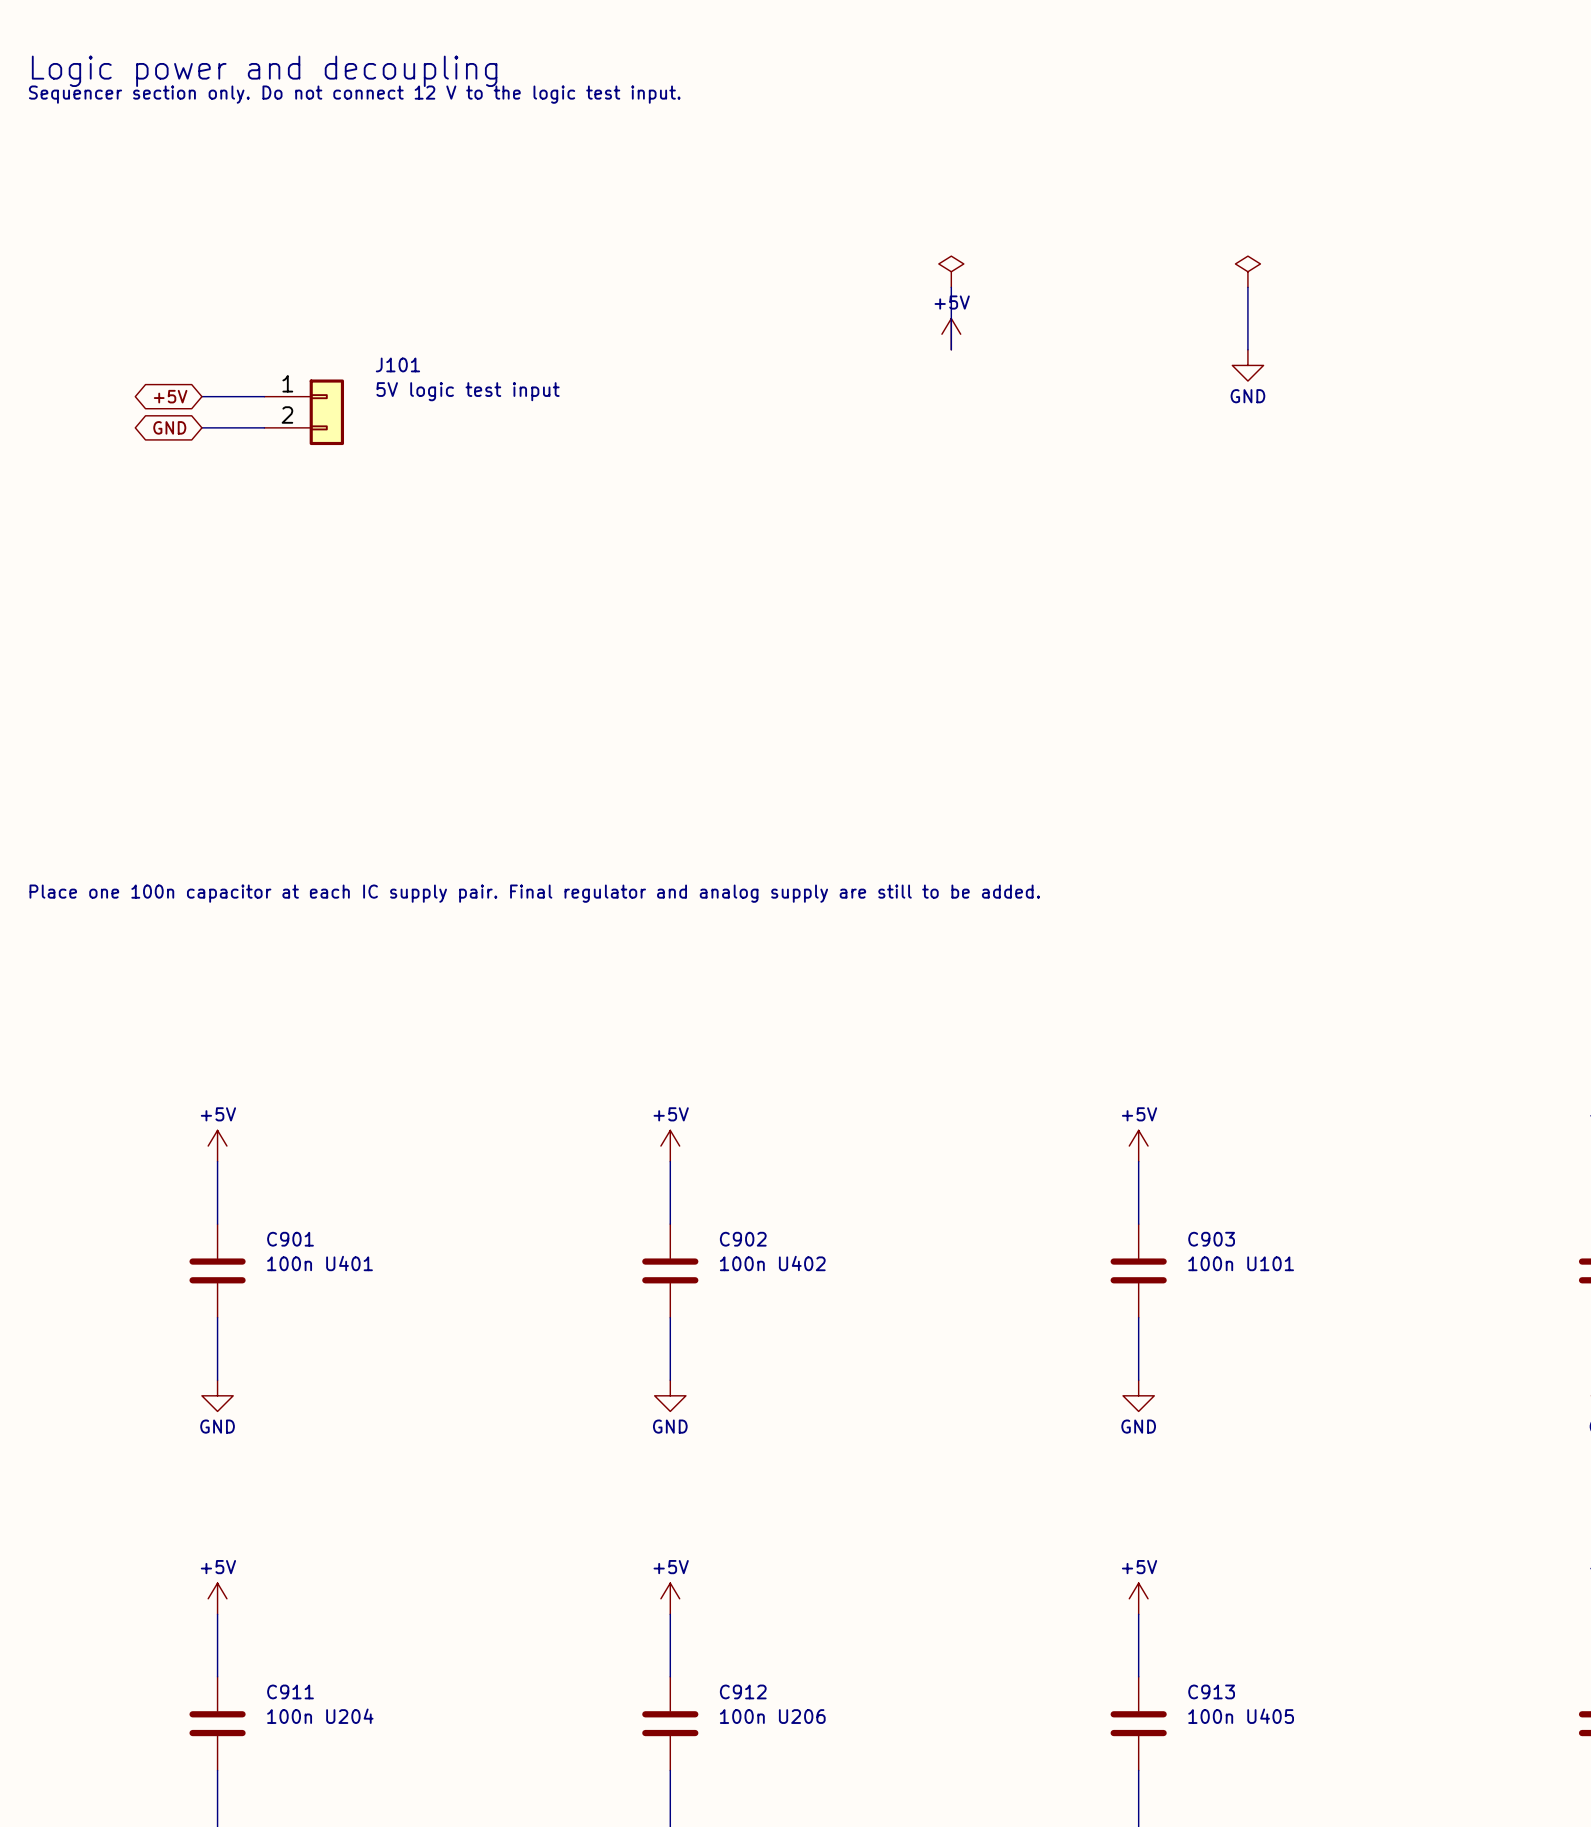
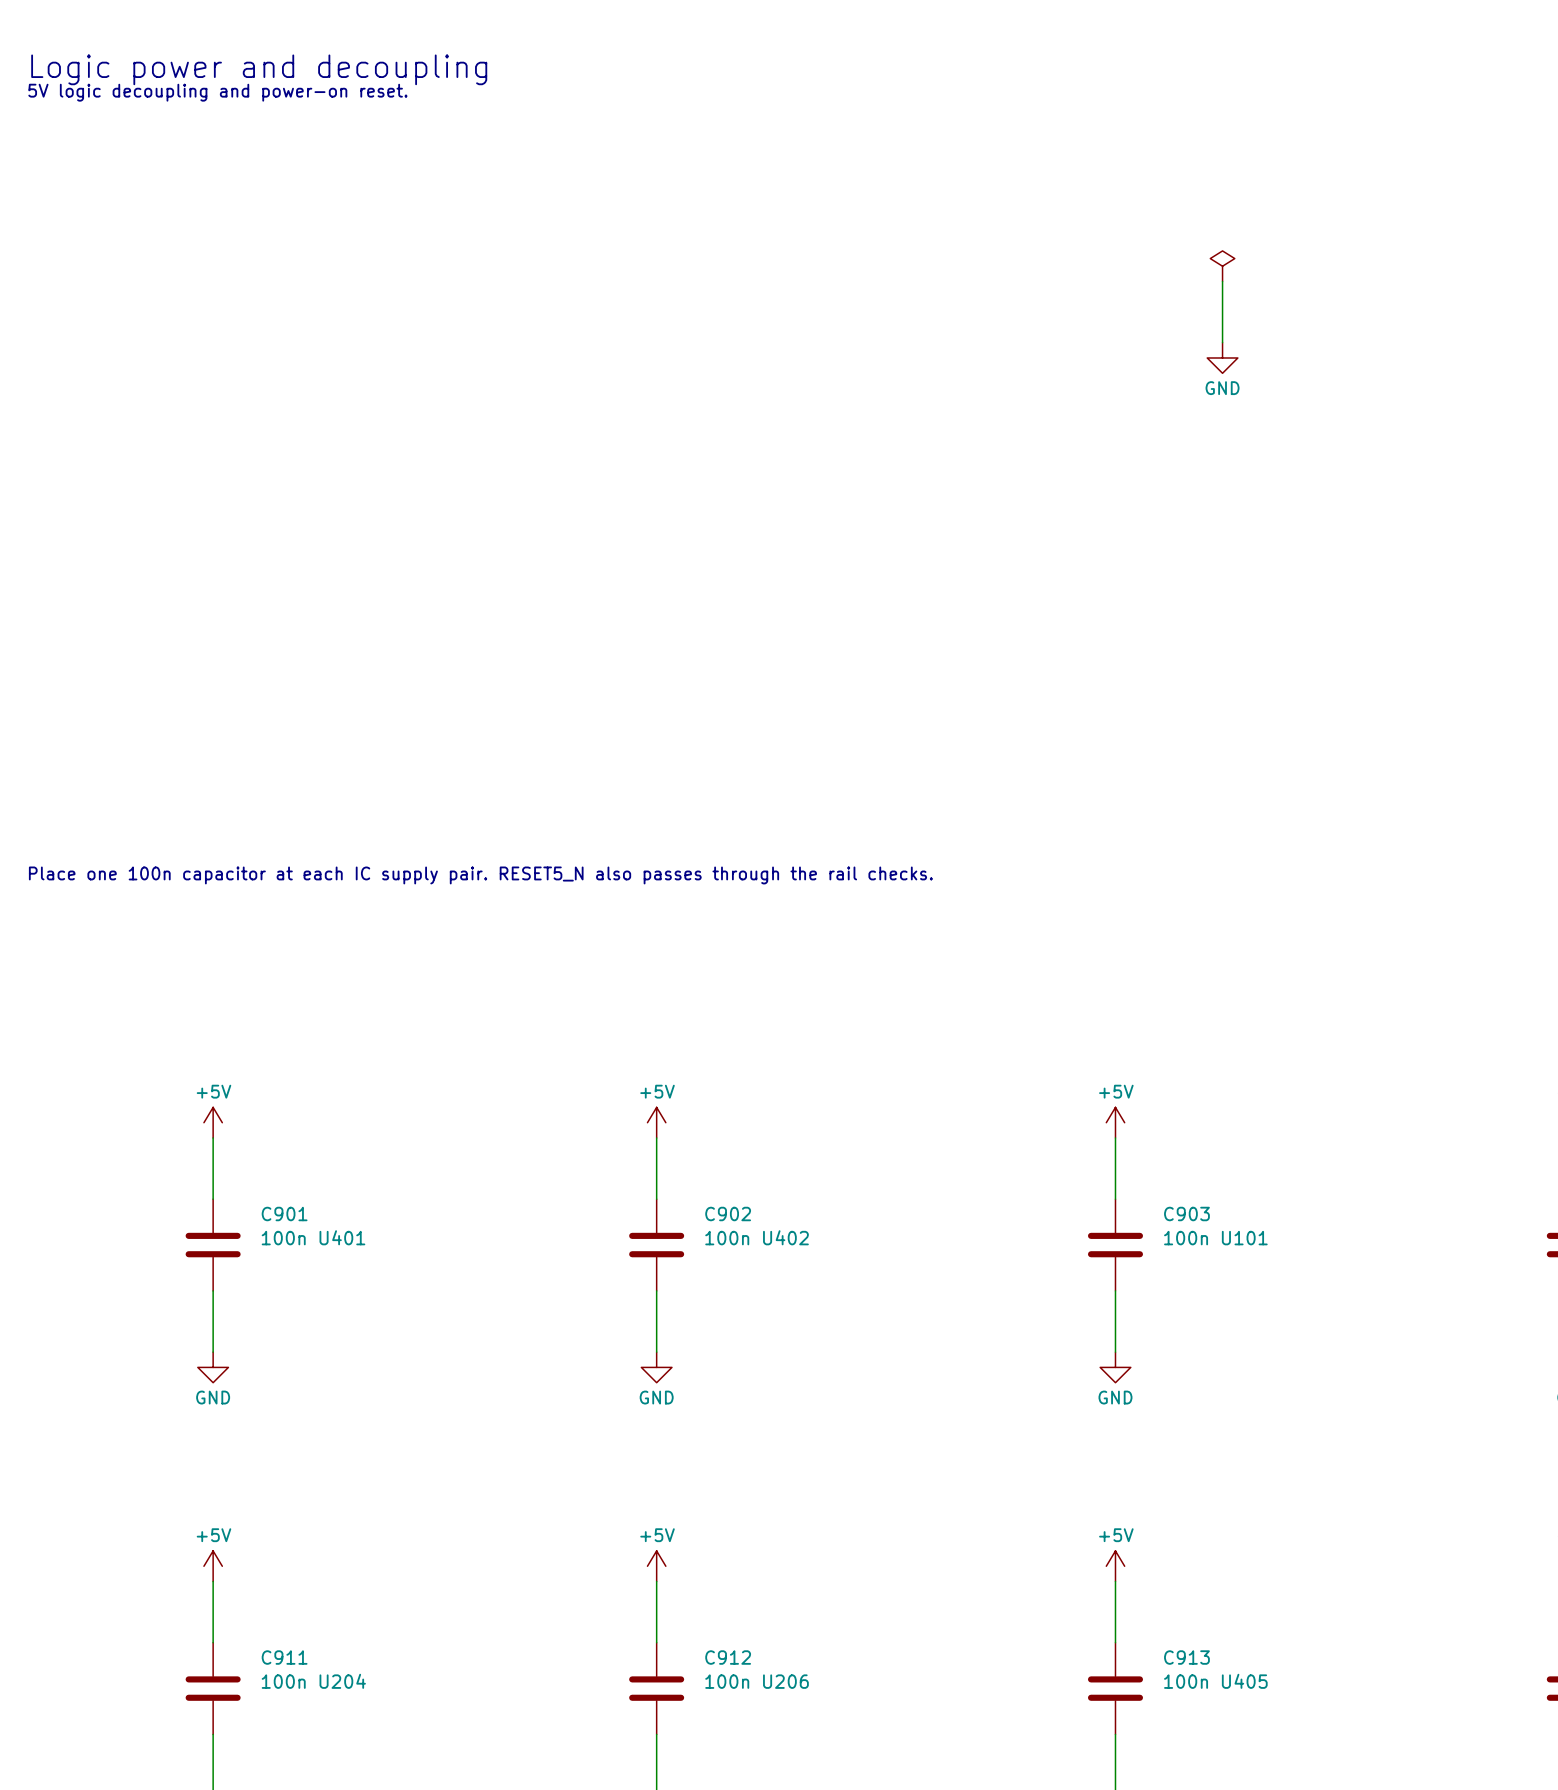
text: Sequencer section only. Do not connect 12 V to the logic test input. (354, 94) -> 5V logic decoupling and power-on reset. (217, 92)
power symbol: (951, 271) -> none
wire: (951, 287) (951, 349) -> none
power symbol: +5V (951, 334) -> none
global label: +5V (170, 396) -> none
wire: (201, 396) (264, 396) -> none
J101: 5V logic test input (304, 412) -> none
global label: GND (169, 427) -> none
wire: (201, 427) (264, 427) -> none
text: Place one 100n capacitor at each IC supply pair. Final regulator and analog supply are still to be added. (534, 893) -> Place one 100n capacitor at each IC supply pair. RESET5_N also passes through the rail checks. (480, 875)

